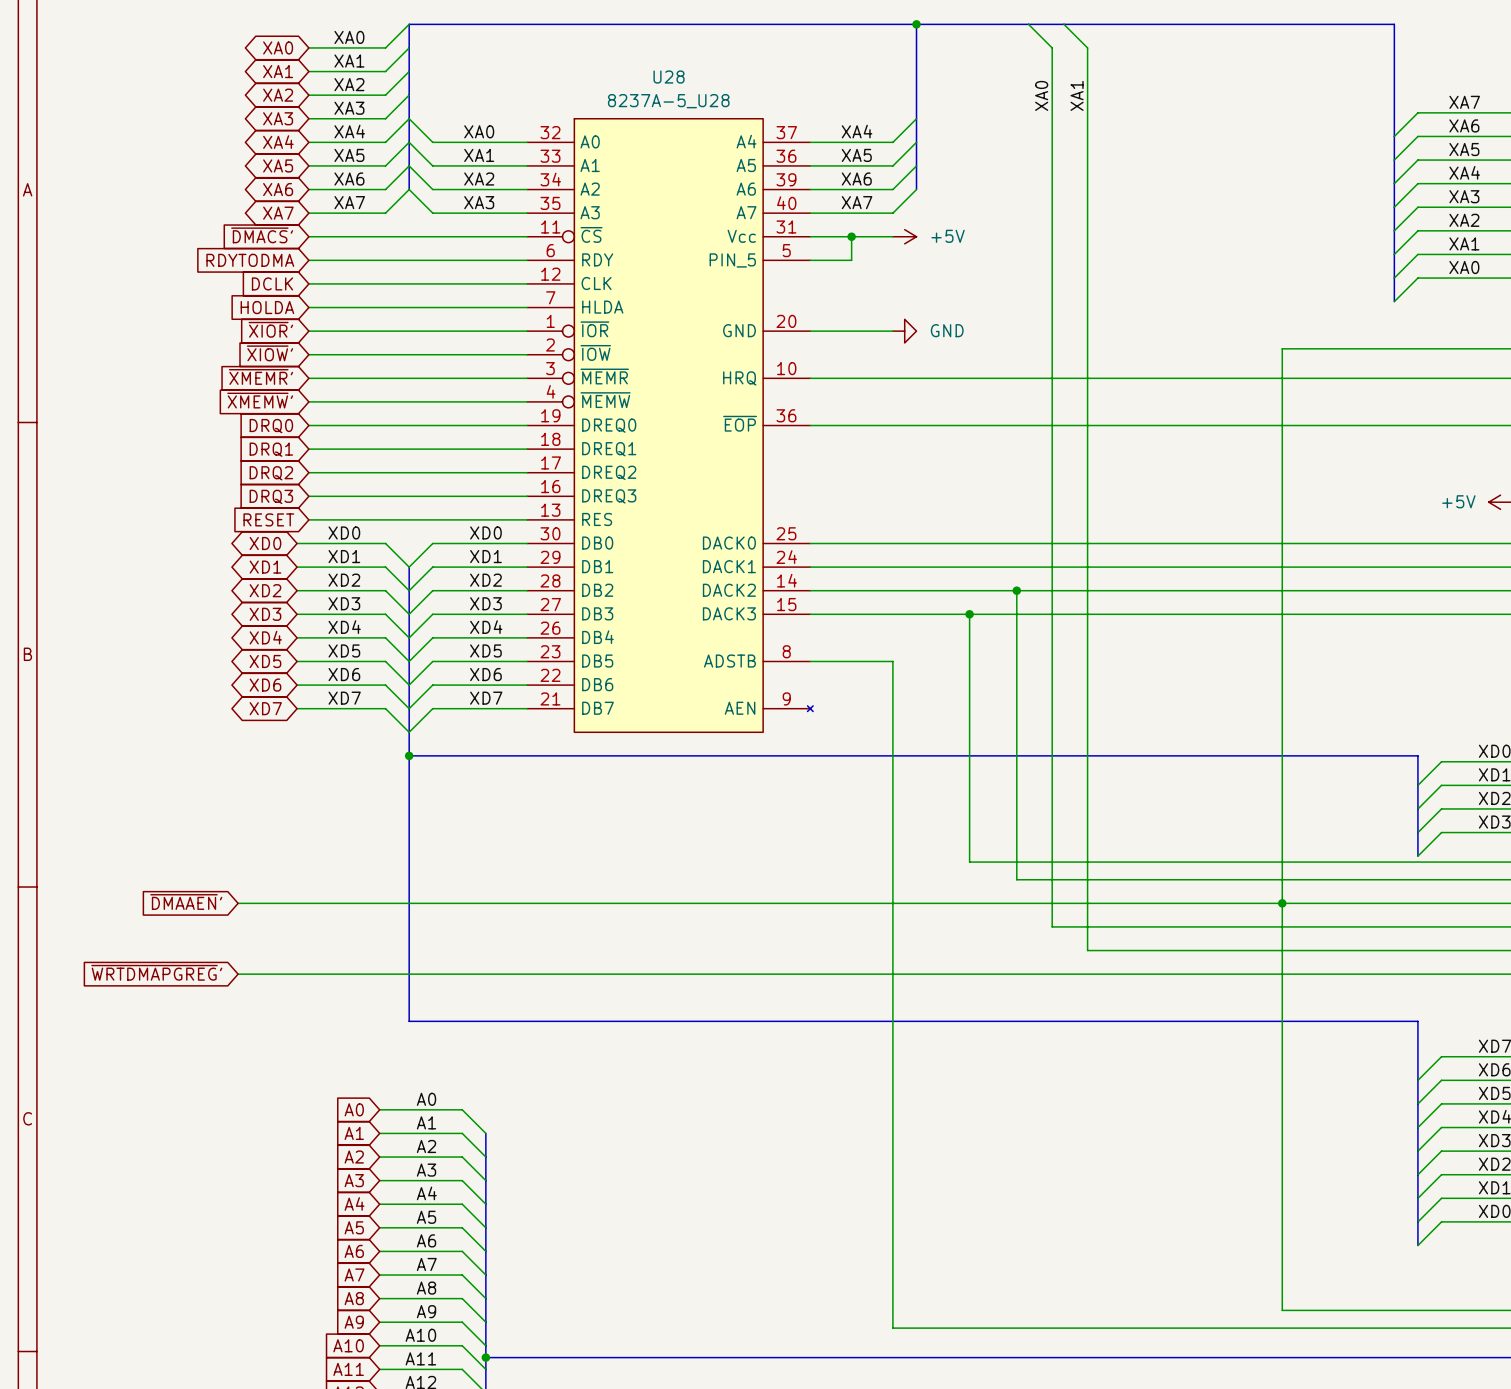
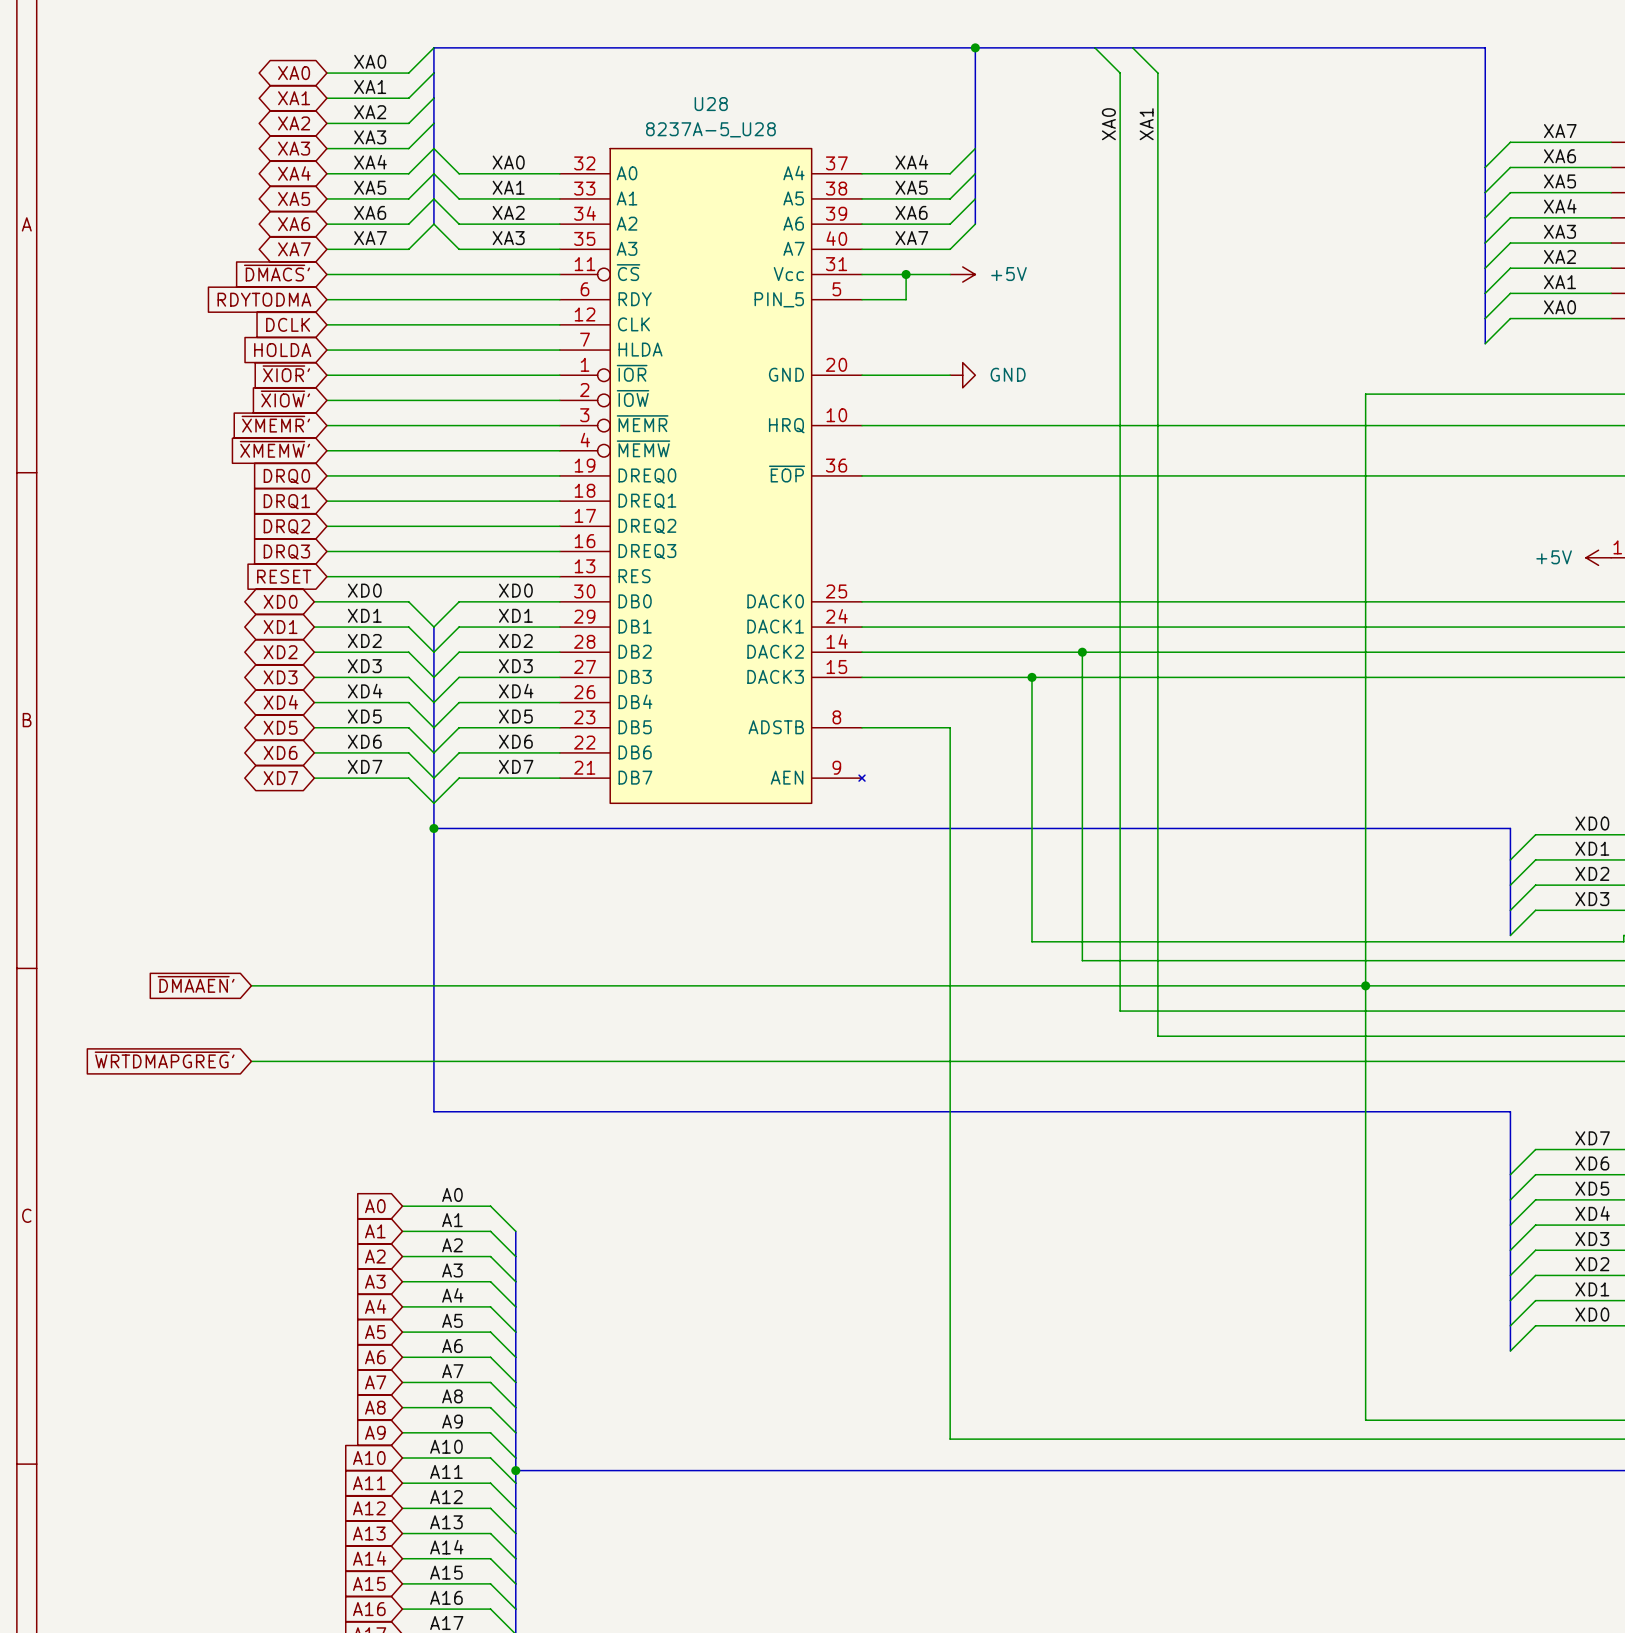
U28 pin number: 36 (786, 156) -> 38 (836, 188)

